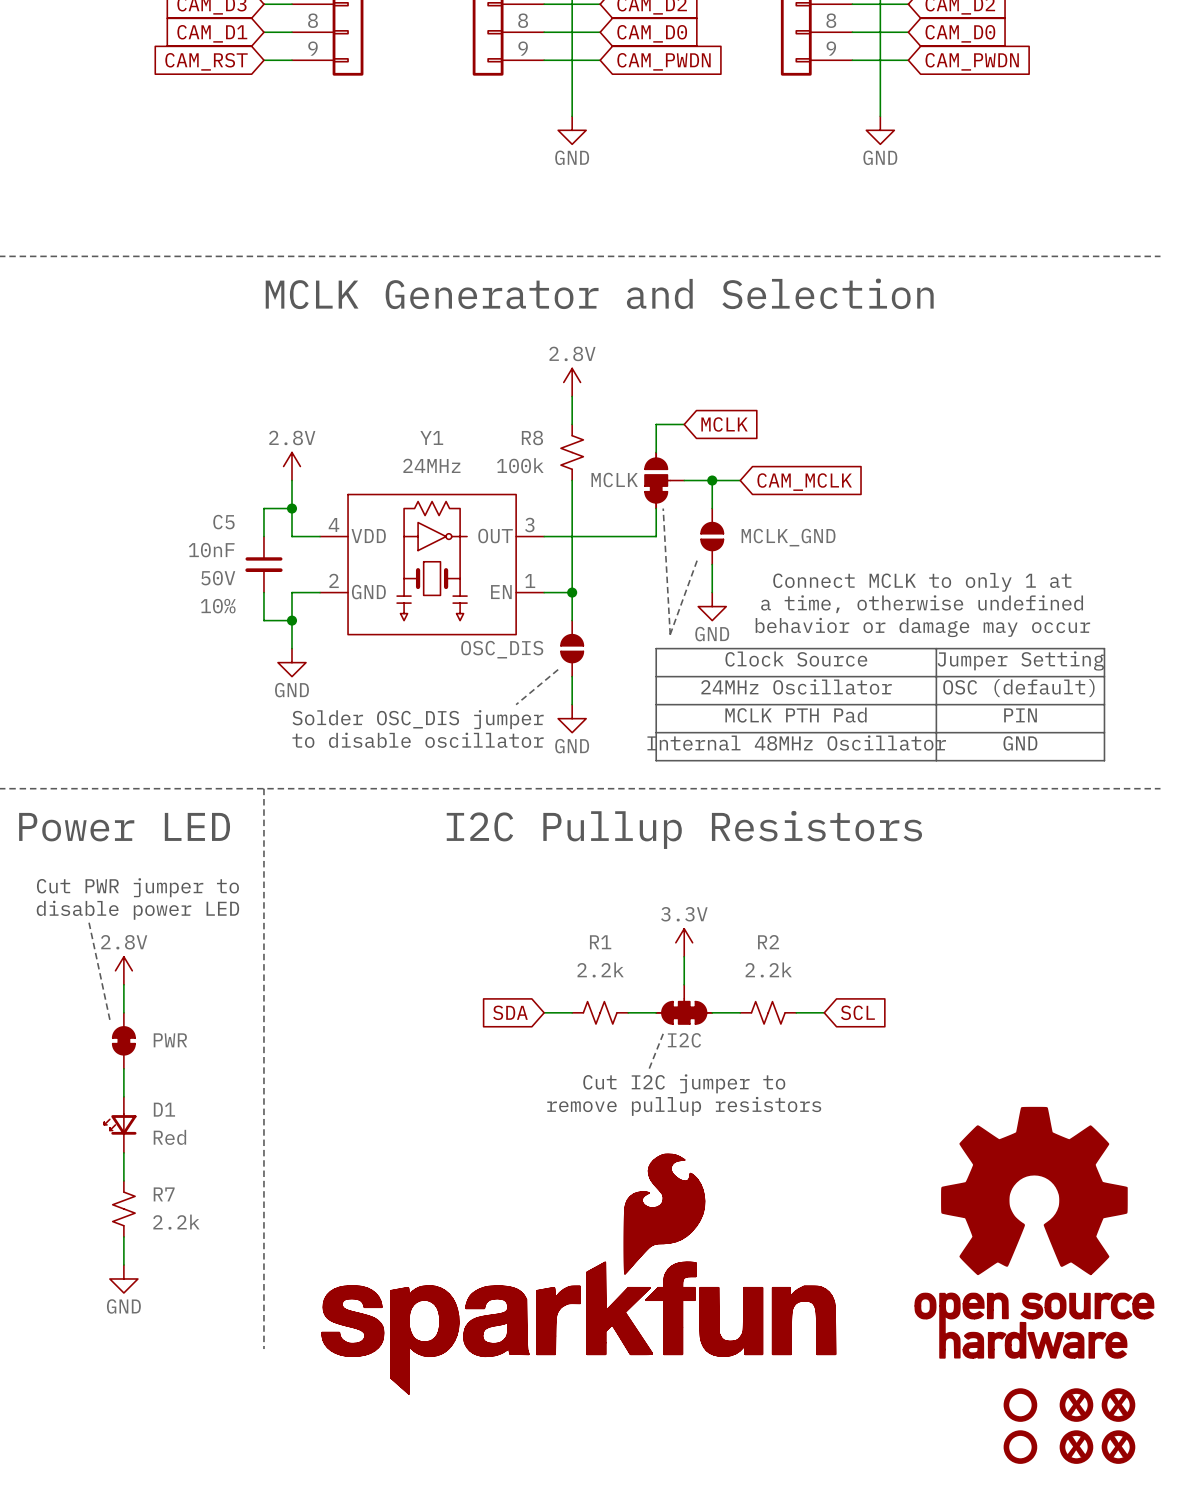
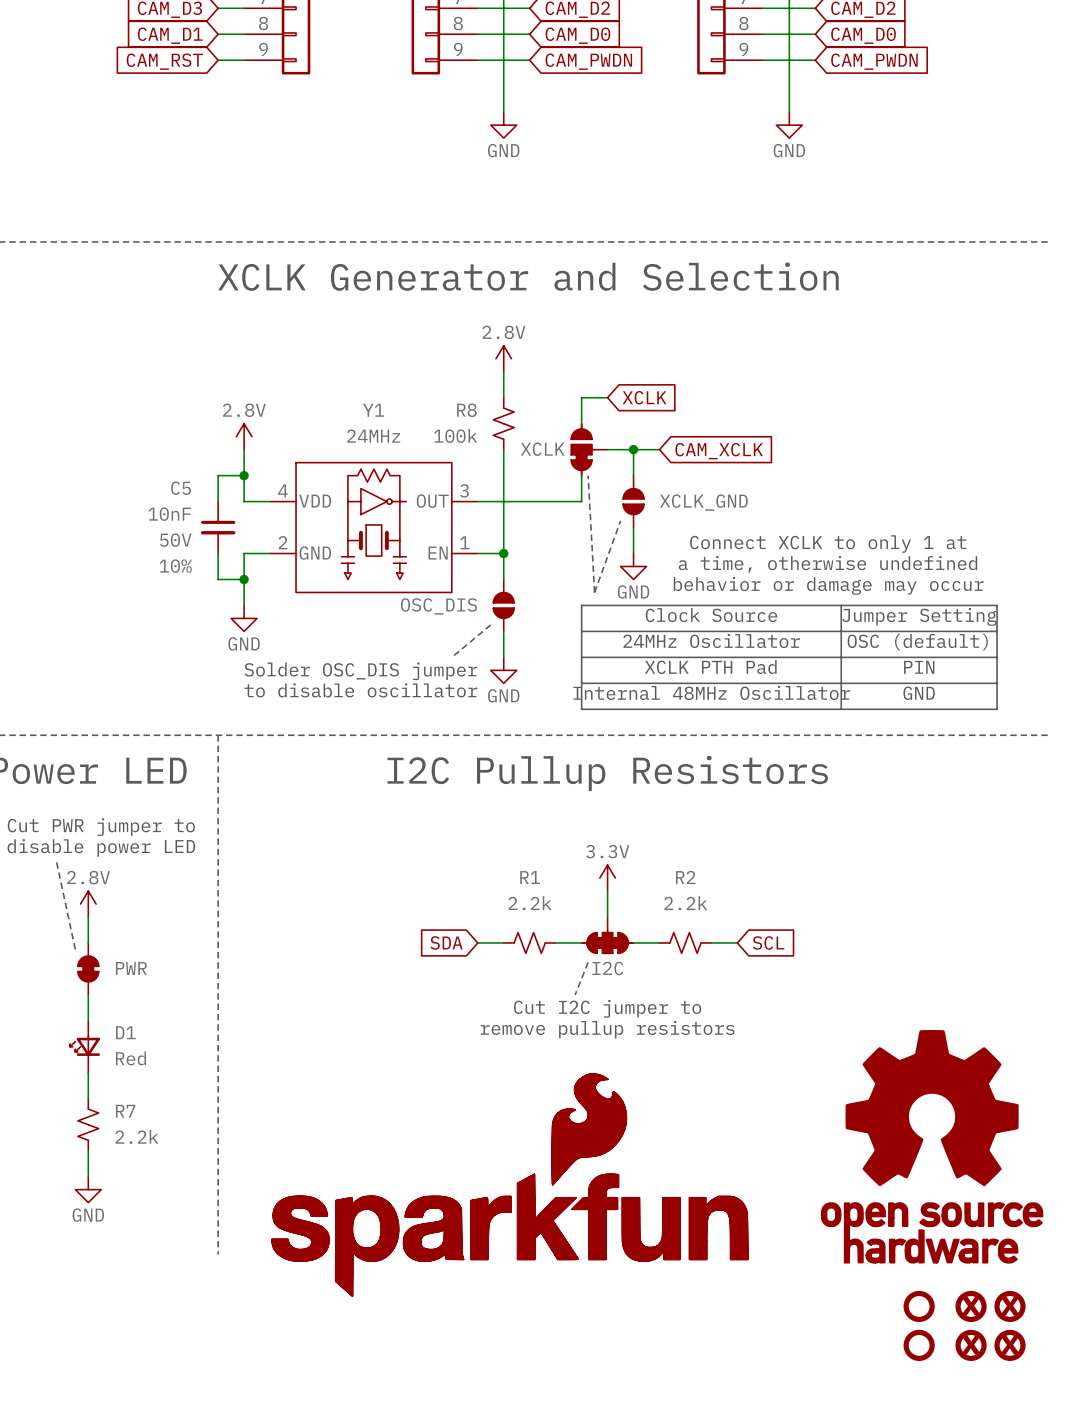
text: MCLK Generator and Selection (599, 293) -> XCLK Generator and Selection (528, 276)
global label: MCLK (724, 424) -> XCLK (644, 397)
part value: MCLK (614, 479) -> XCLK (542, 449)
global label: CAM_MCLK (804, 482) -> CAM_XCLK (719, 451)
part value: MCLK_GND (788, 537) -> XCLK_GND (703, 502)
text: Connect MCLK to only 1 at (922, 582) -> Connect XCLK to only 1 at (828, 544)
text: MCLK PTH Pad (796, 715) -> XCLK PTH Pad (710, 667)

